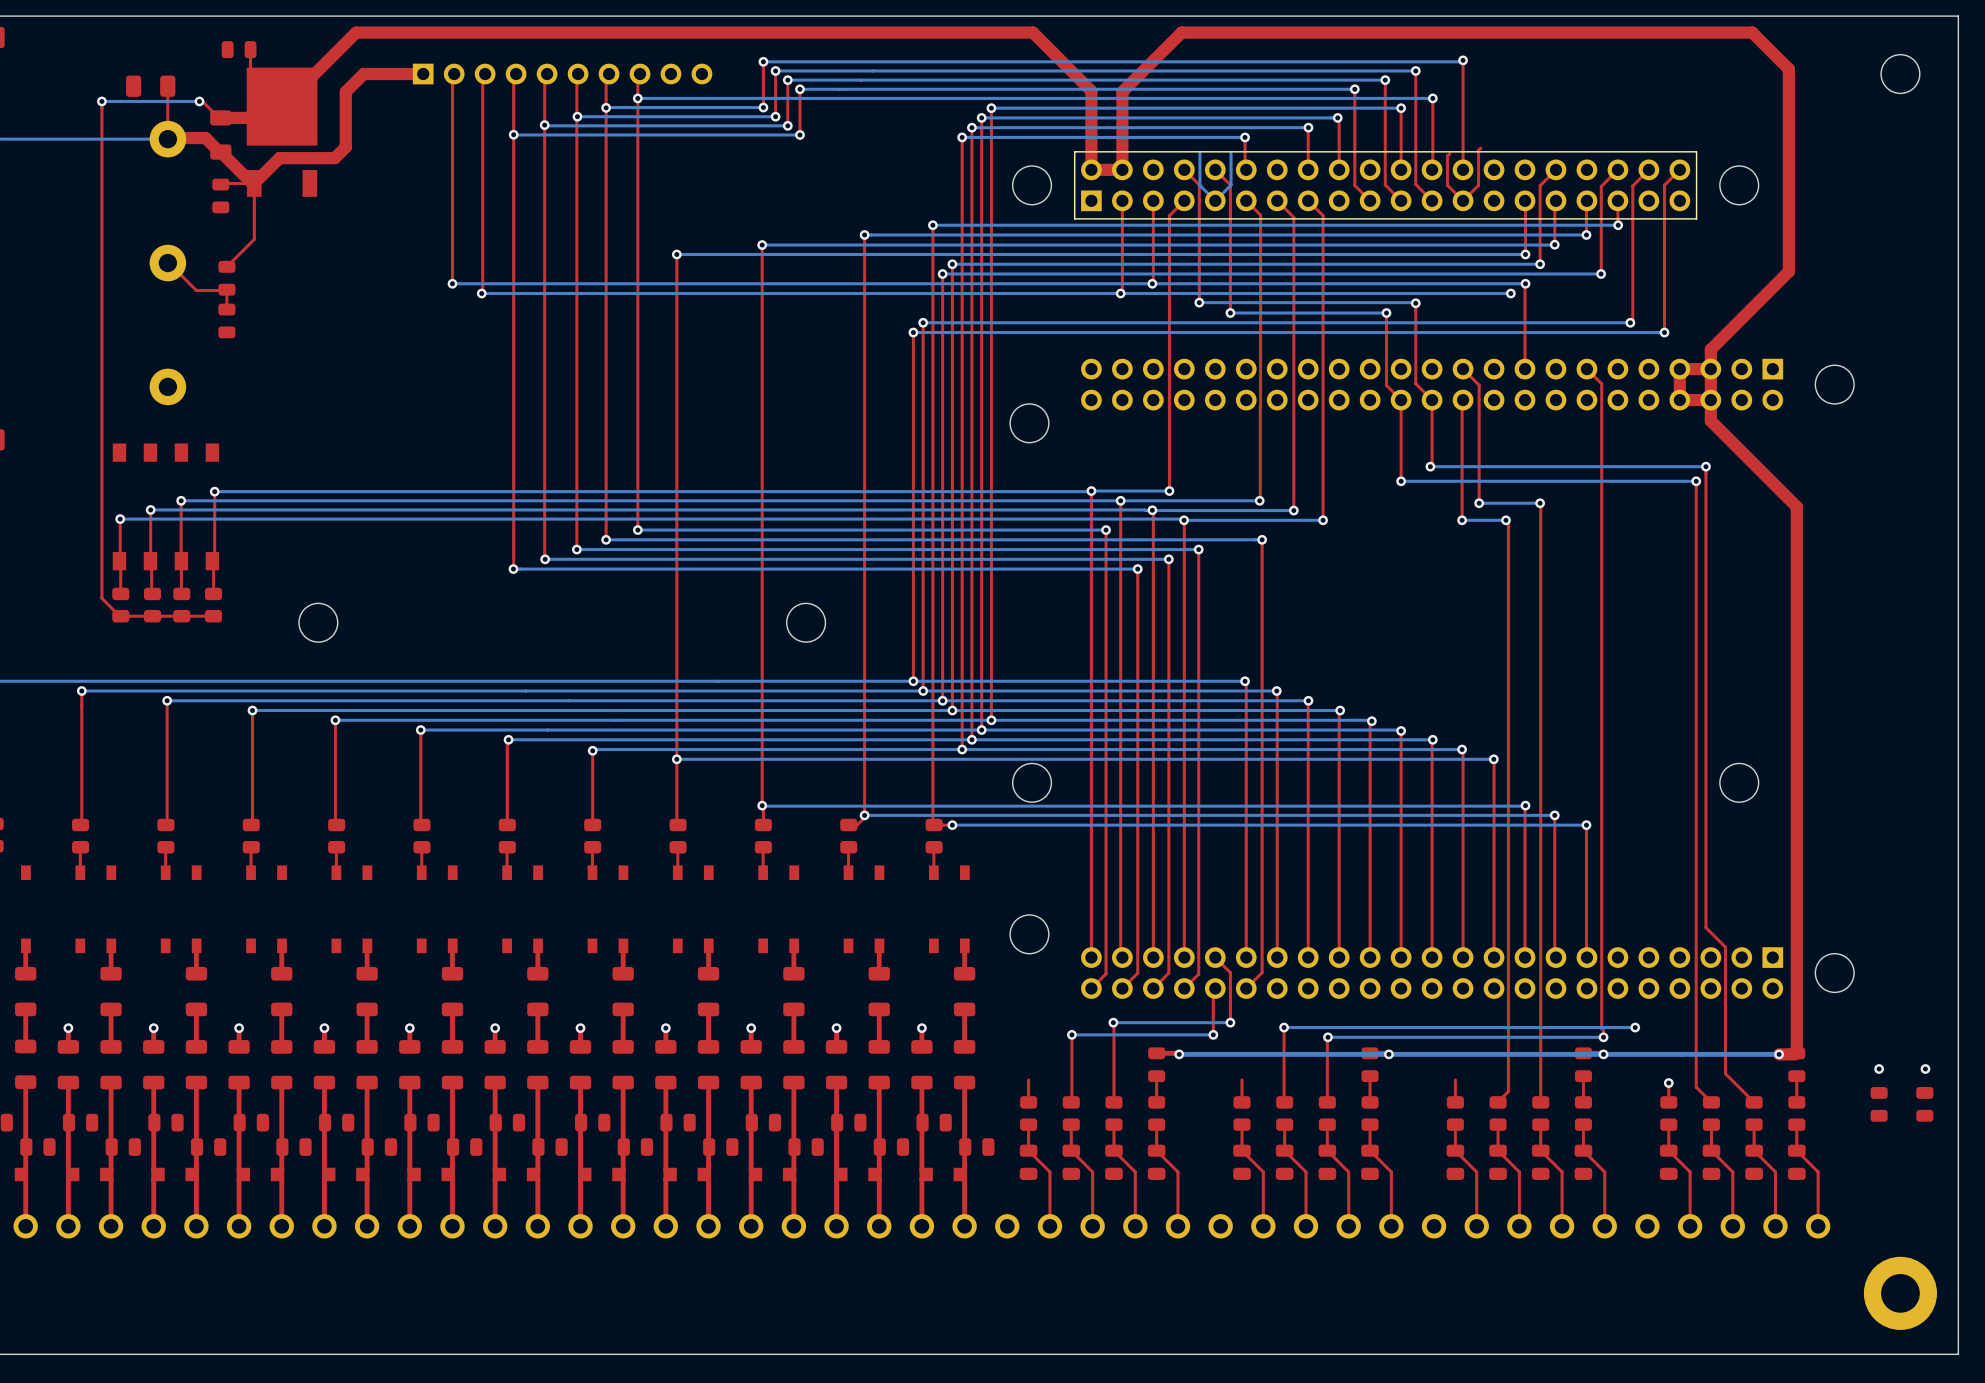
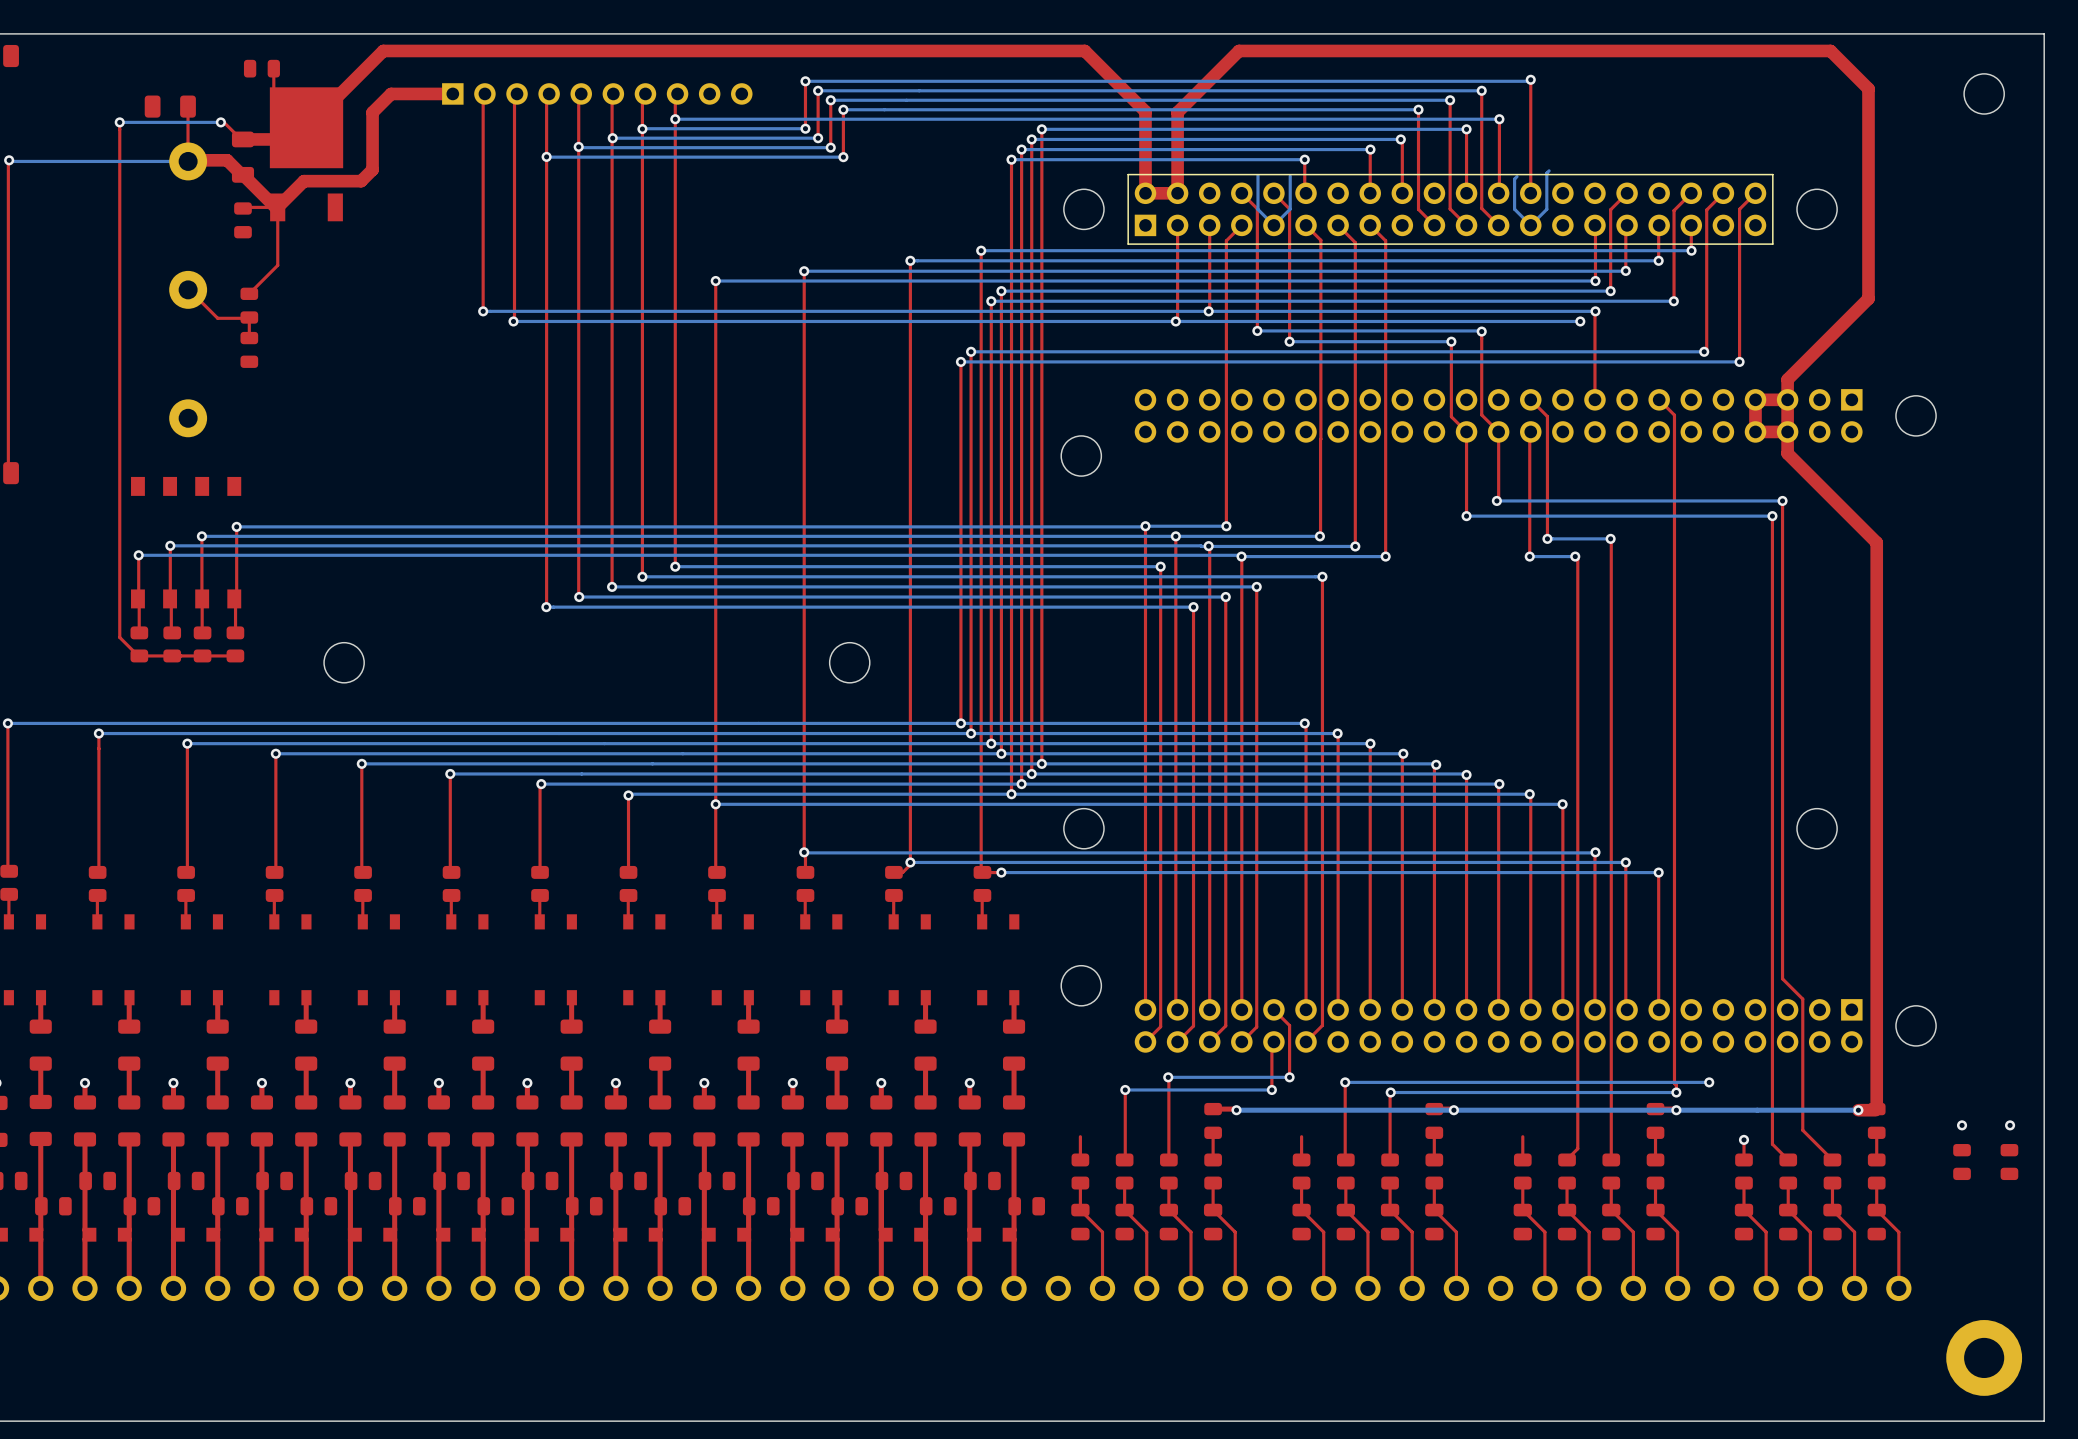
top track: (1480, 148) (1478, 150) (1478, 185) (1463, 200) (1447, 185) (1447, 156) (1449, 153) -> none
bottom track: none -> (1549, 170) (1546, 173) (1546, 209) (1530, 225) (1514, 209) (1514, 179) (1517, 176)

